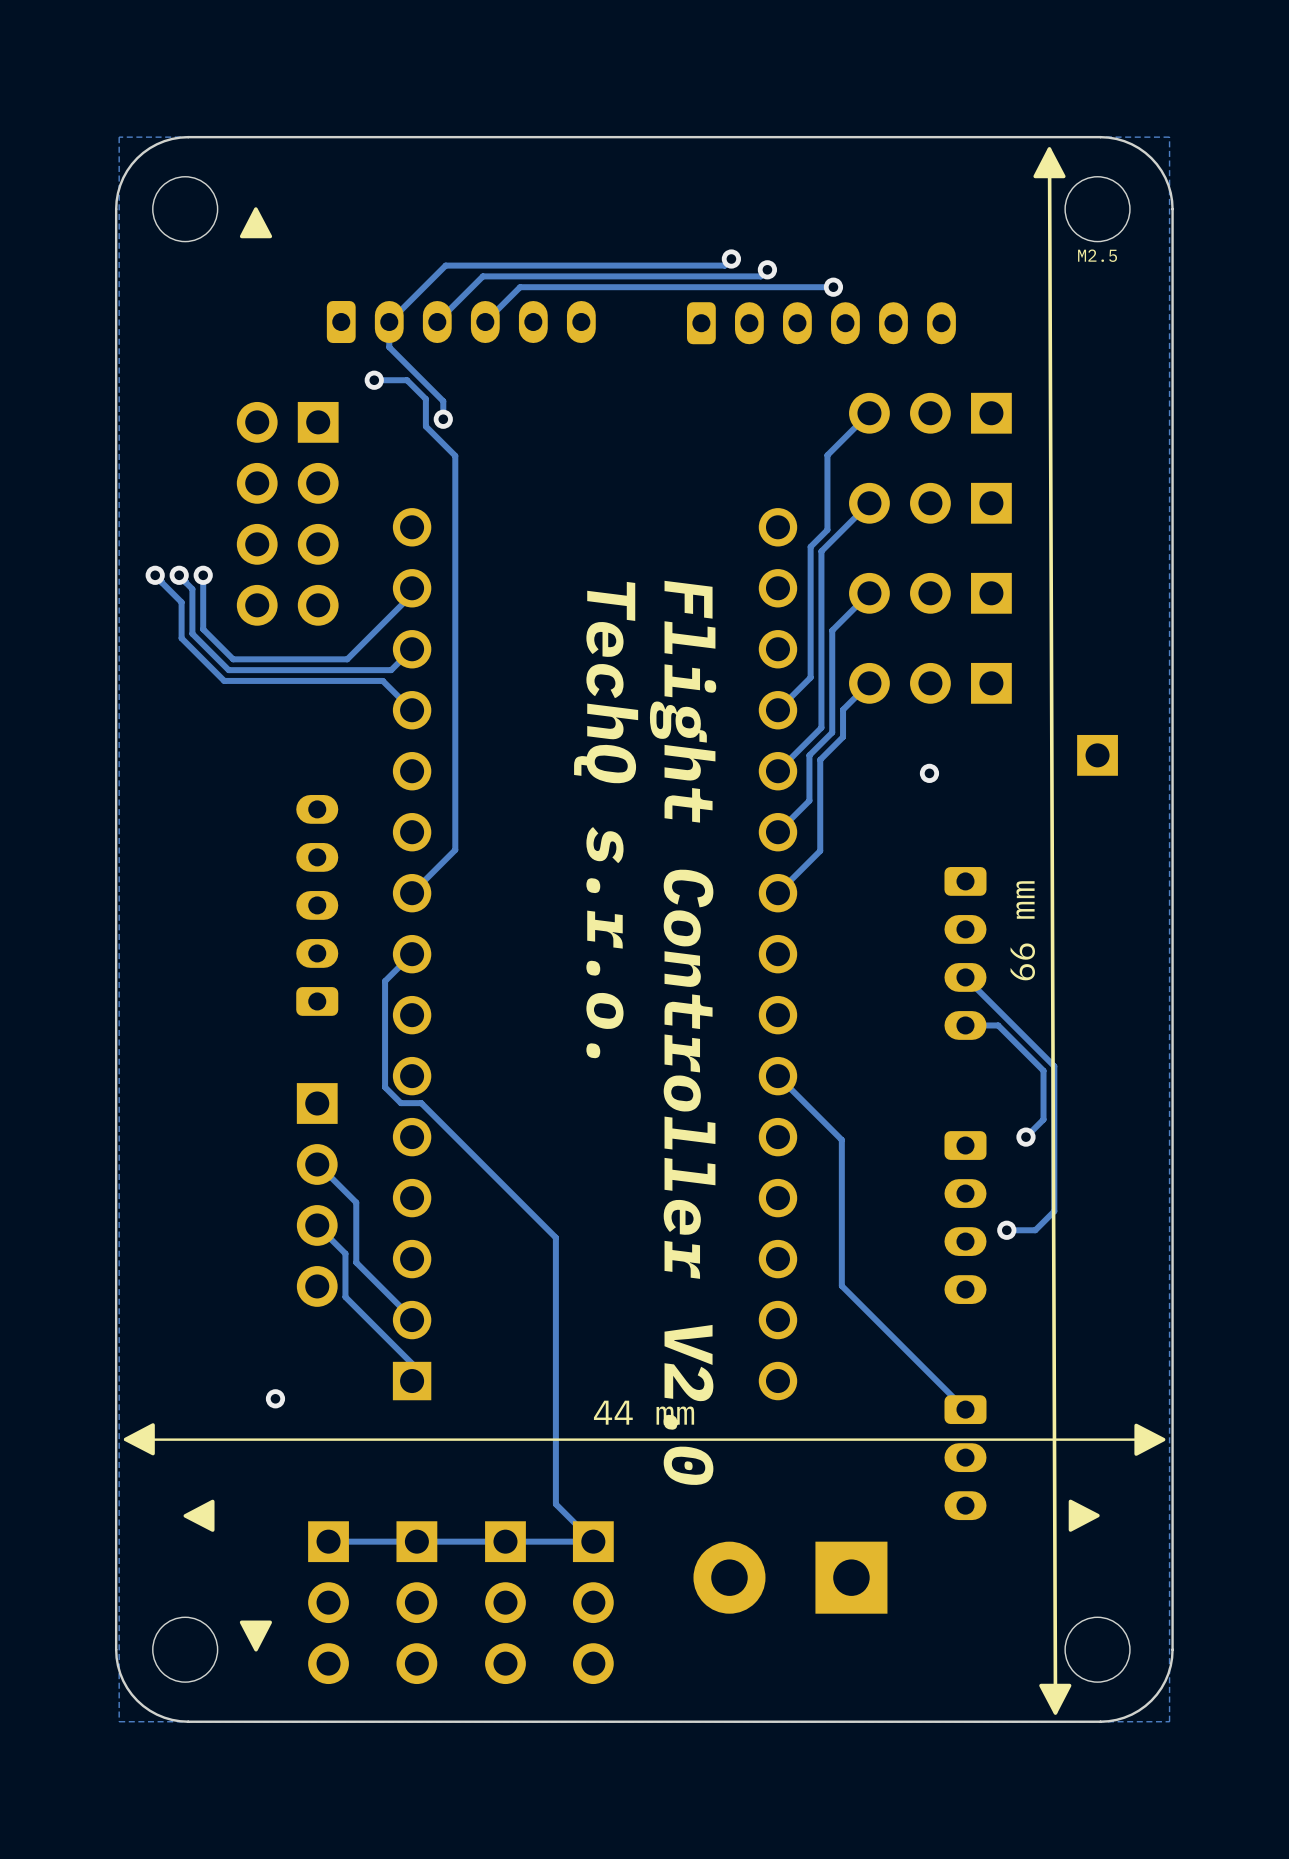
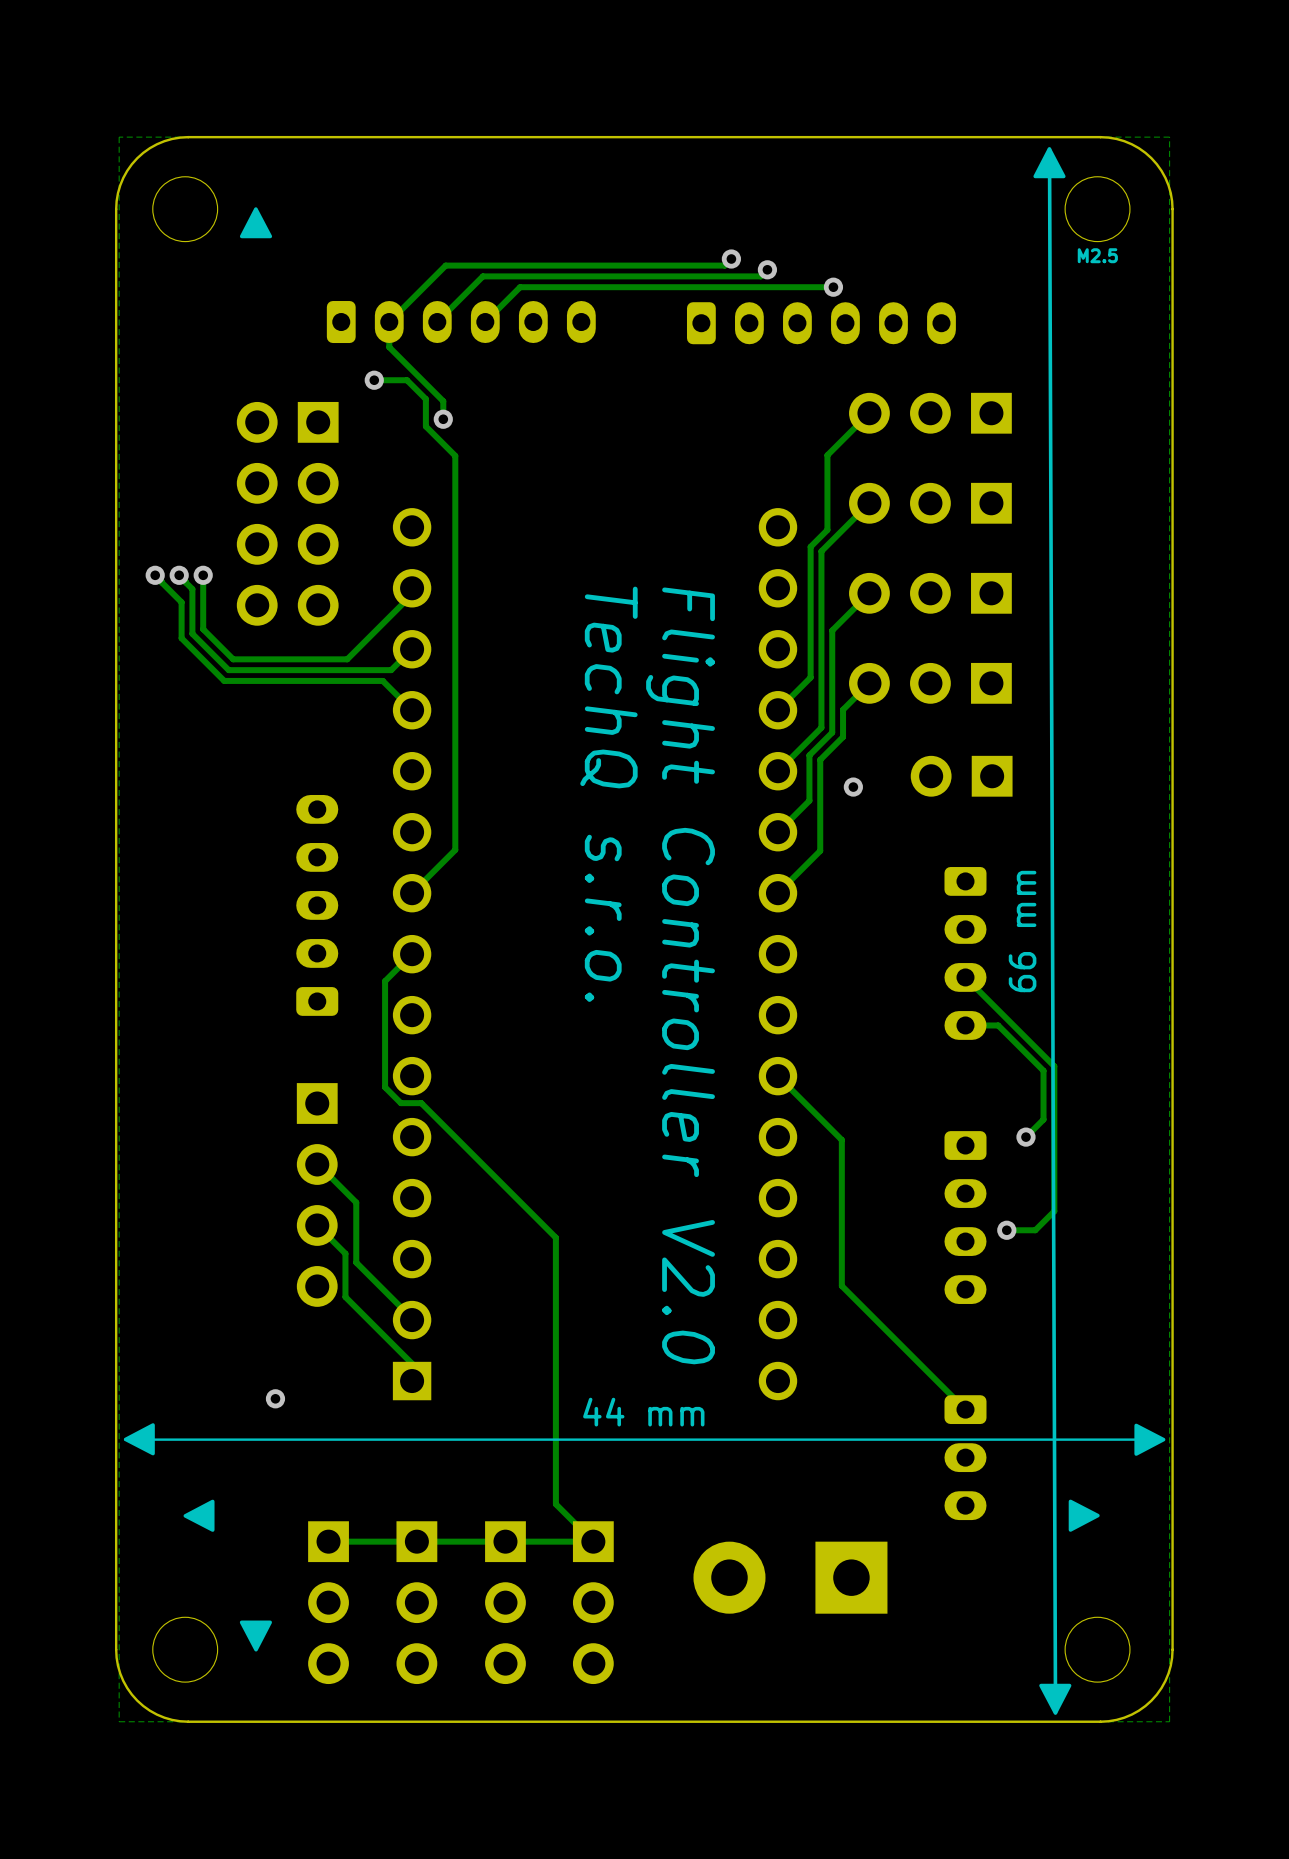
part: (1097, 755) -> none
via position: (929, 773) -> (853, 787)
part: none -> (961, 776)

